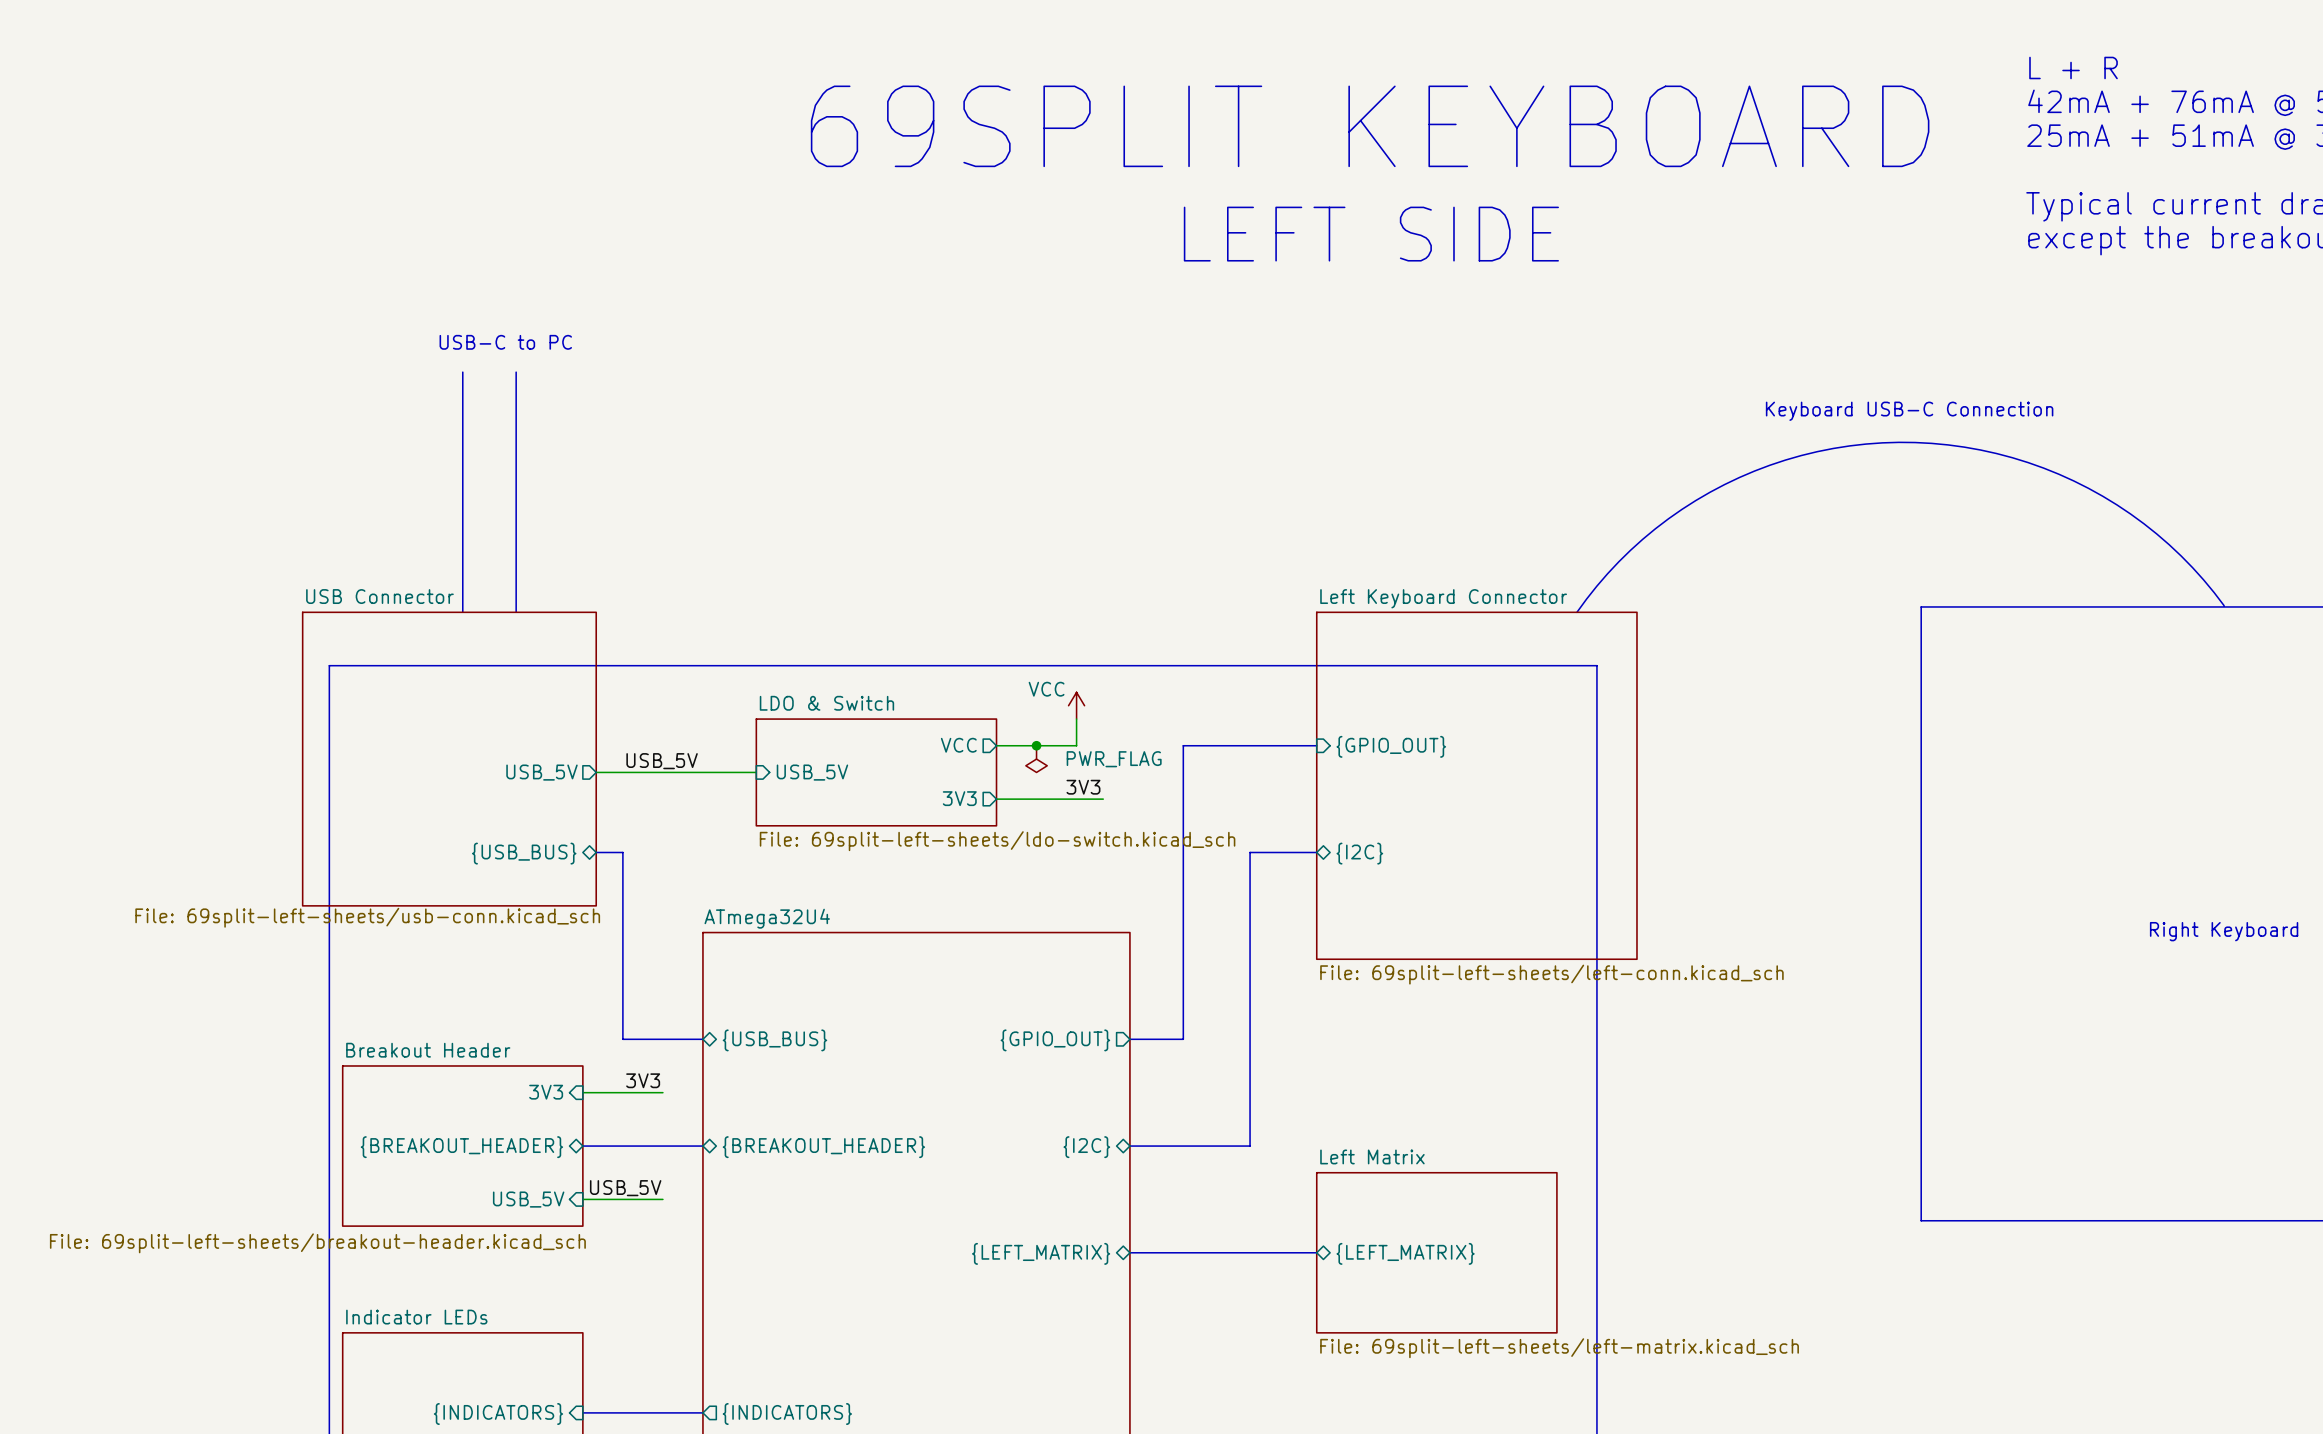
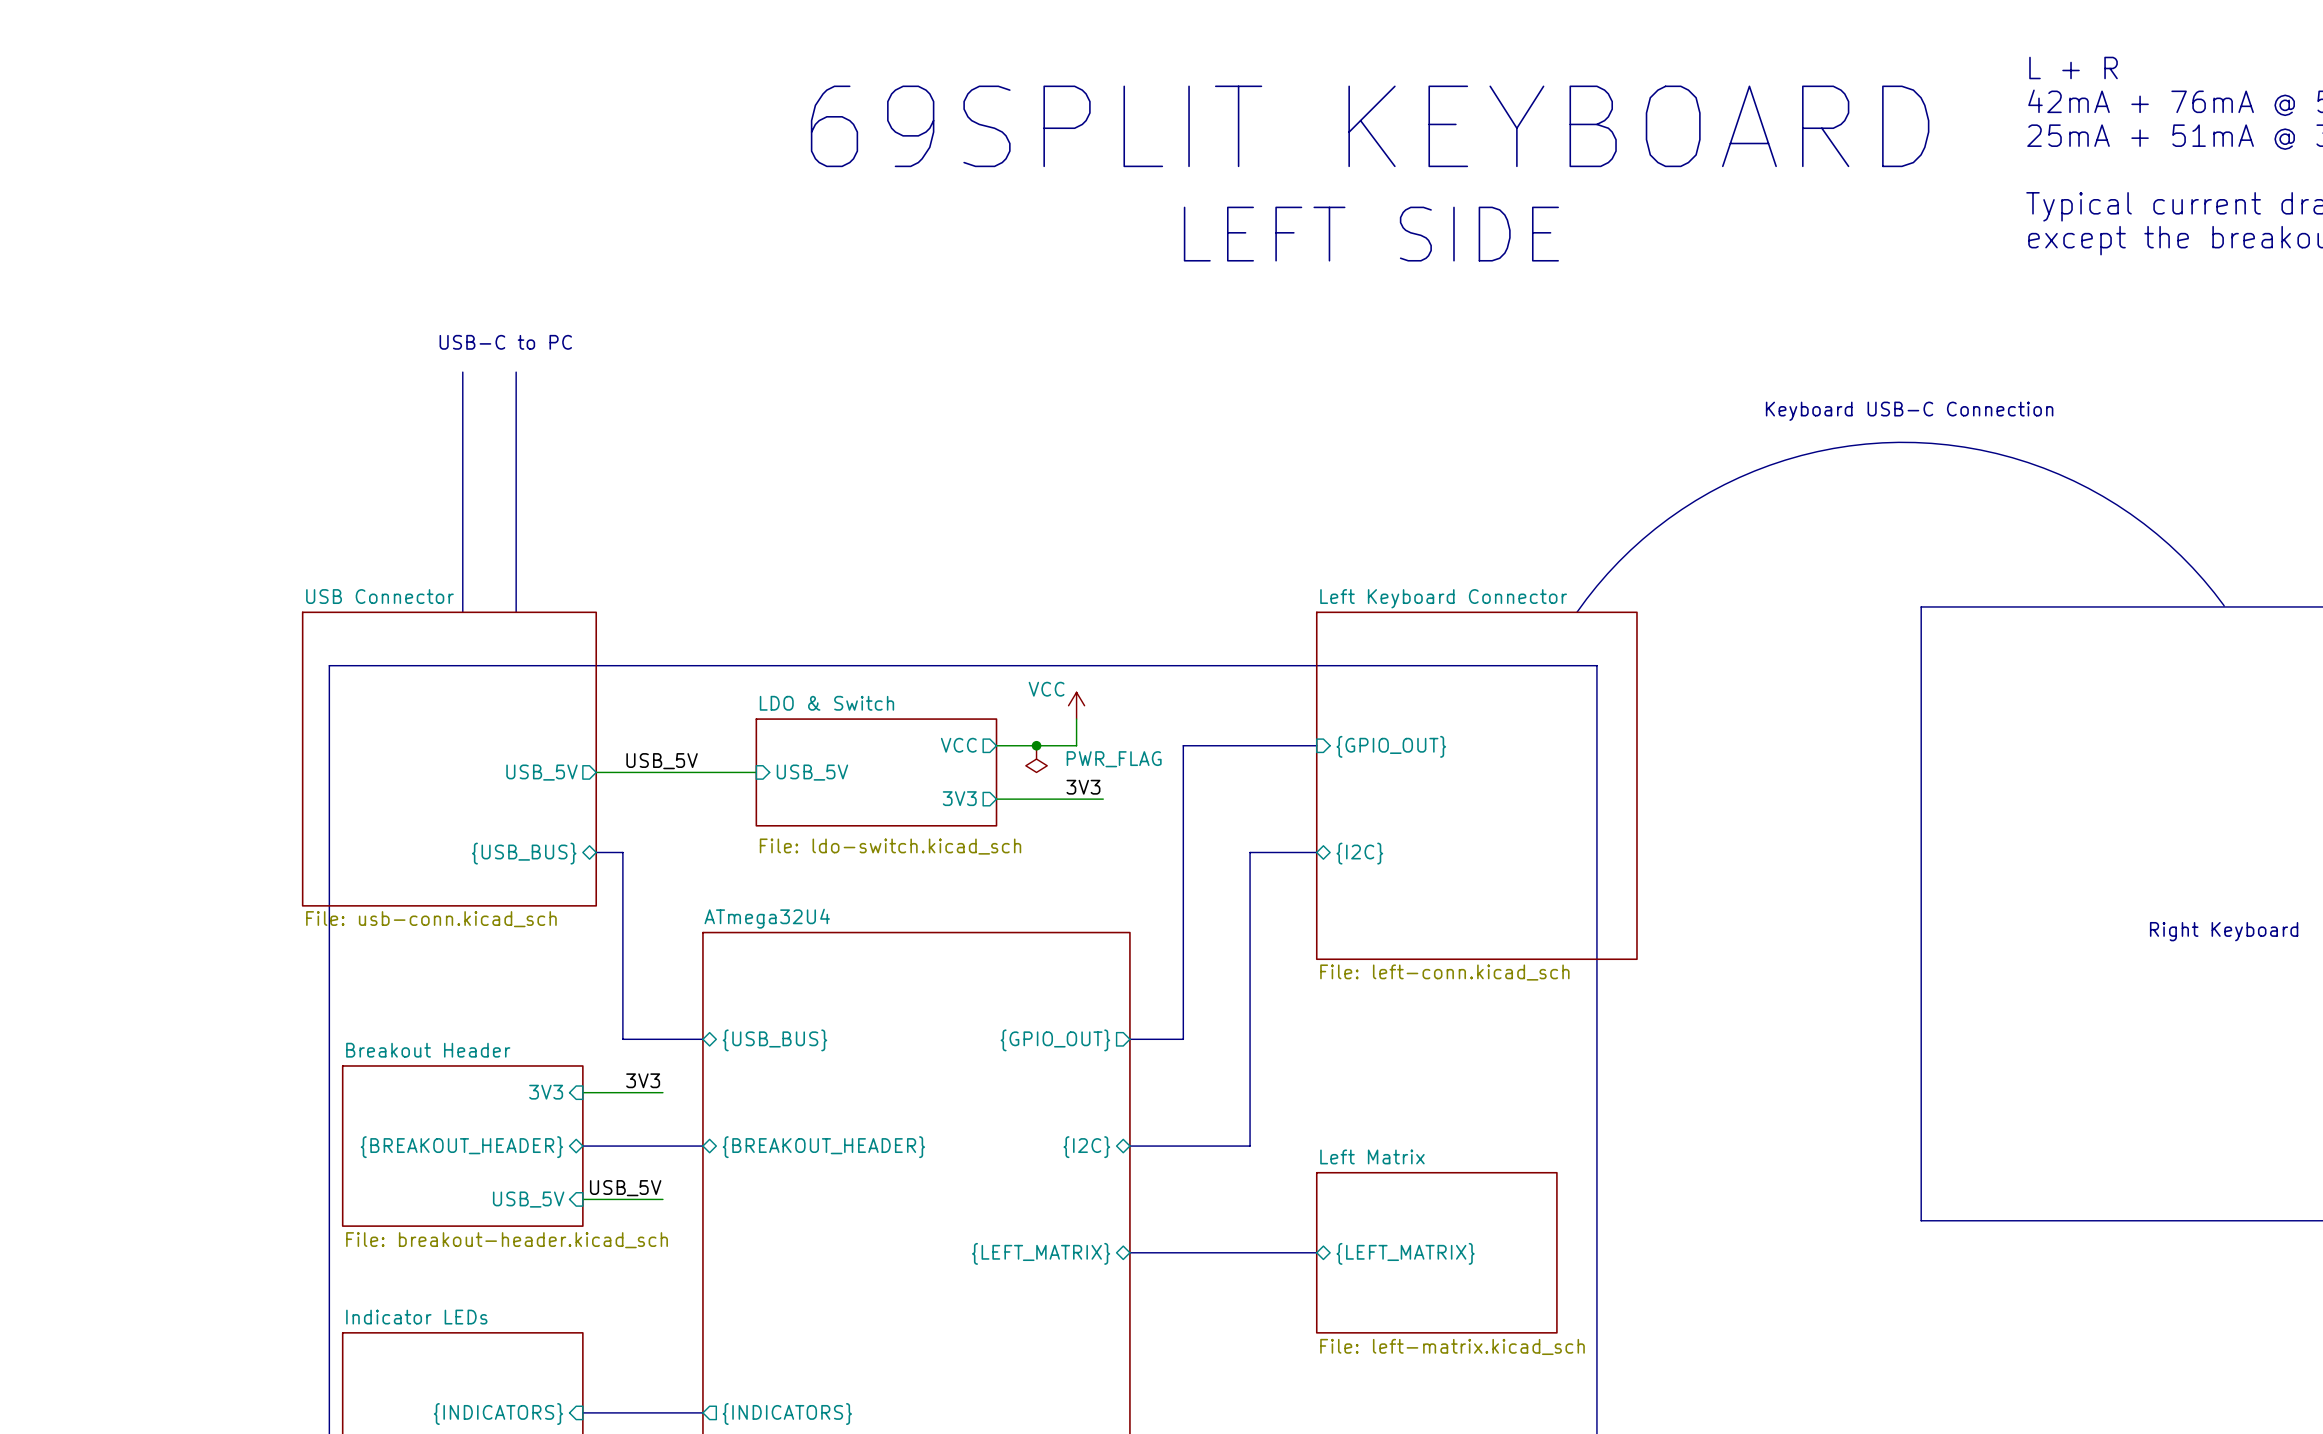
sheet LDO & Switch value: File: 69split-left-sheets/ldo-switch.kicad_sch (997, 841) -> File: ldo-switch.kicad_sch (890, 846)
sheet USB Connector value: File: 69split-left-sheets/usb-conn.kicad_sch (367, 917) -> File: usb-conn.kicad_sch (431, 919)
sheet Left Keyboard Connector value: File: 69split-left-sheets/left-conn.kicad_sch (1551, 974) -> File: left-conn.kicad_sch (1444, 972)
sheet Breakout Header value: File: 69split-left-sheets/breakout-header.kicad_sch (317, 1243) -> File: breakout-header.kicad_sch (507, 1240)
sheet Left Matrix value: File: 69split-left-sheets/left-matrix.kicad_sch (1559, 1348) -> File: left-matrix.kicad_sch (1452, 1346)

